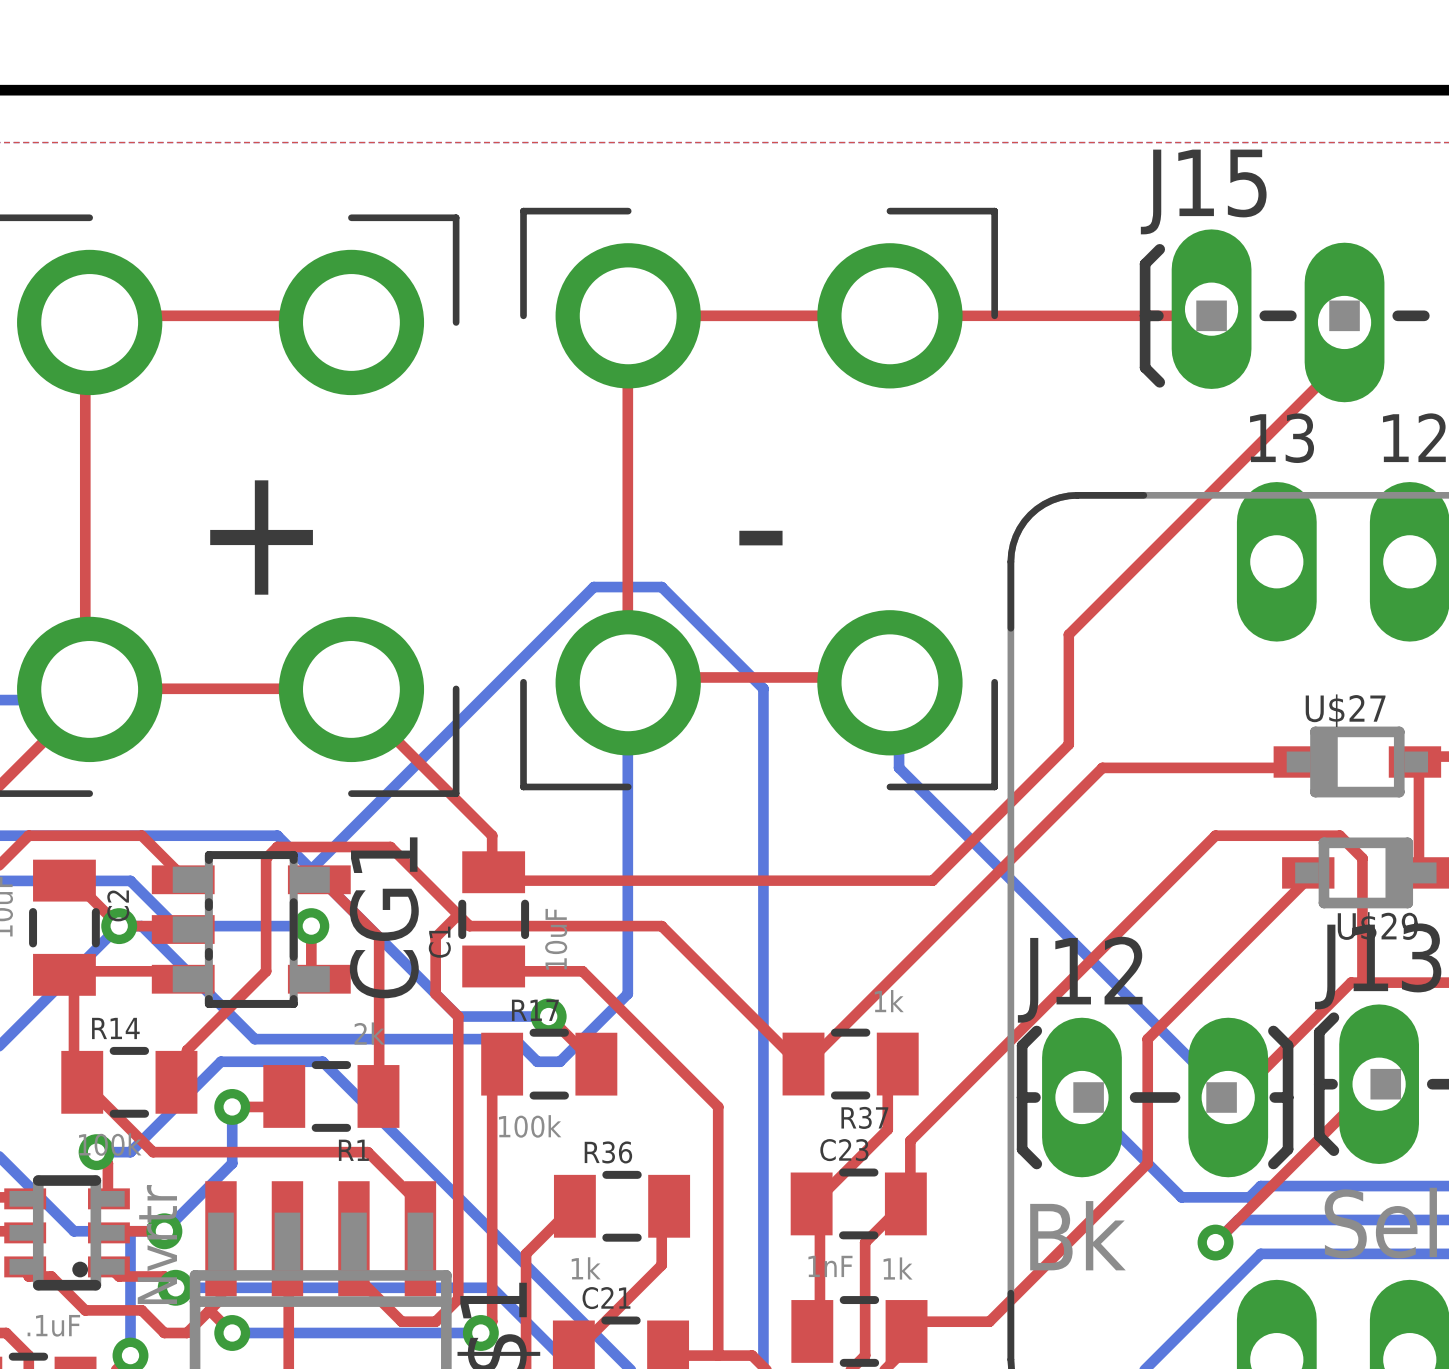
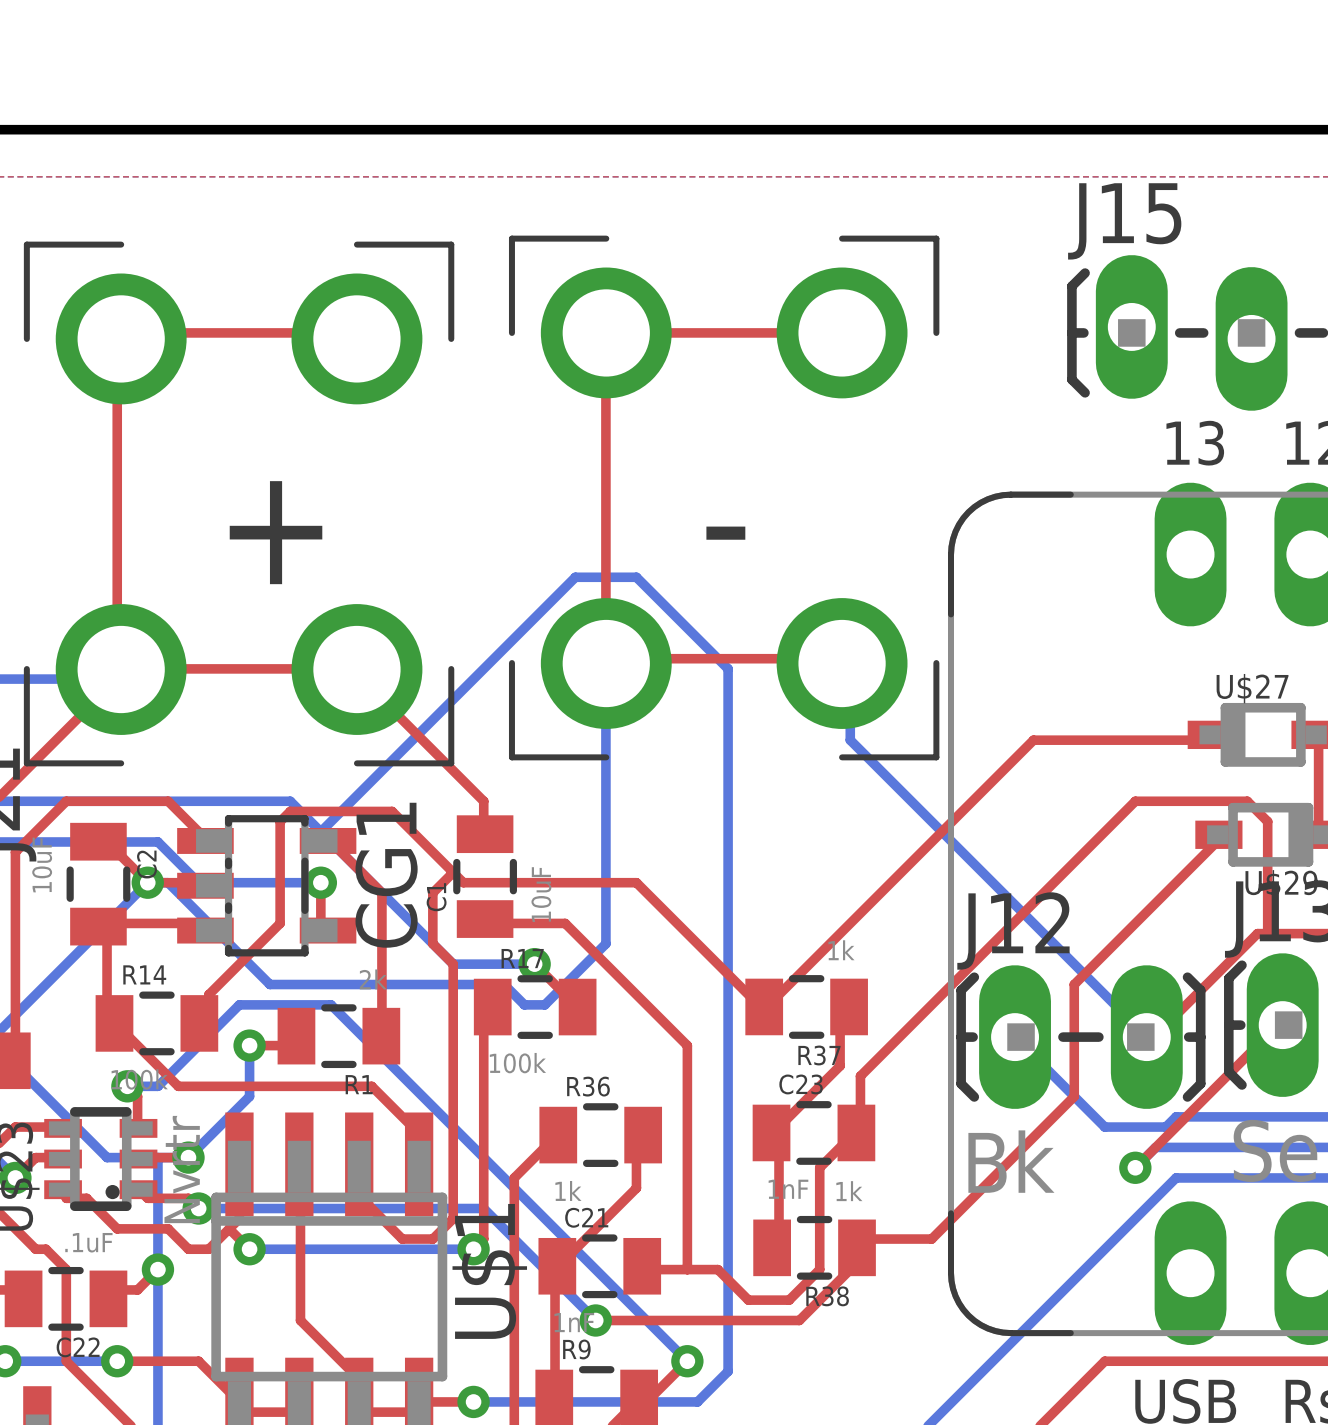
top track: (1211, 309) (1204, 315) (889, 315) -> none
top track: (1344, 322) (1344, 358) (1068, 634) (1068, 744) (932, 880) (502, 880) (493, 872) -> none

